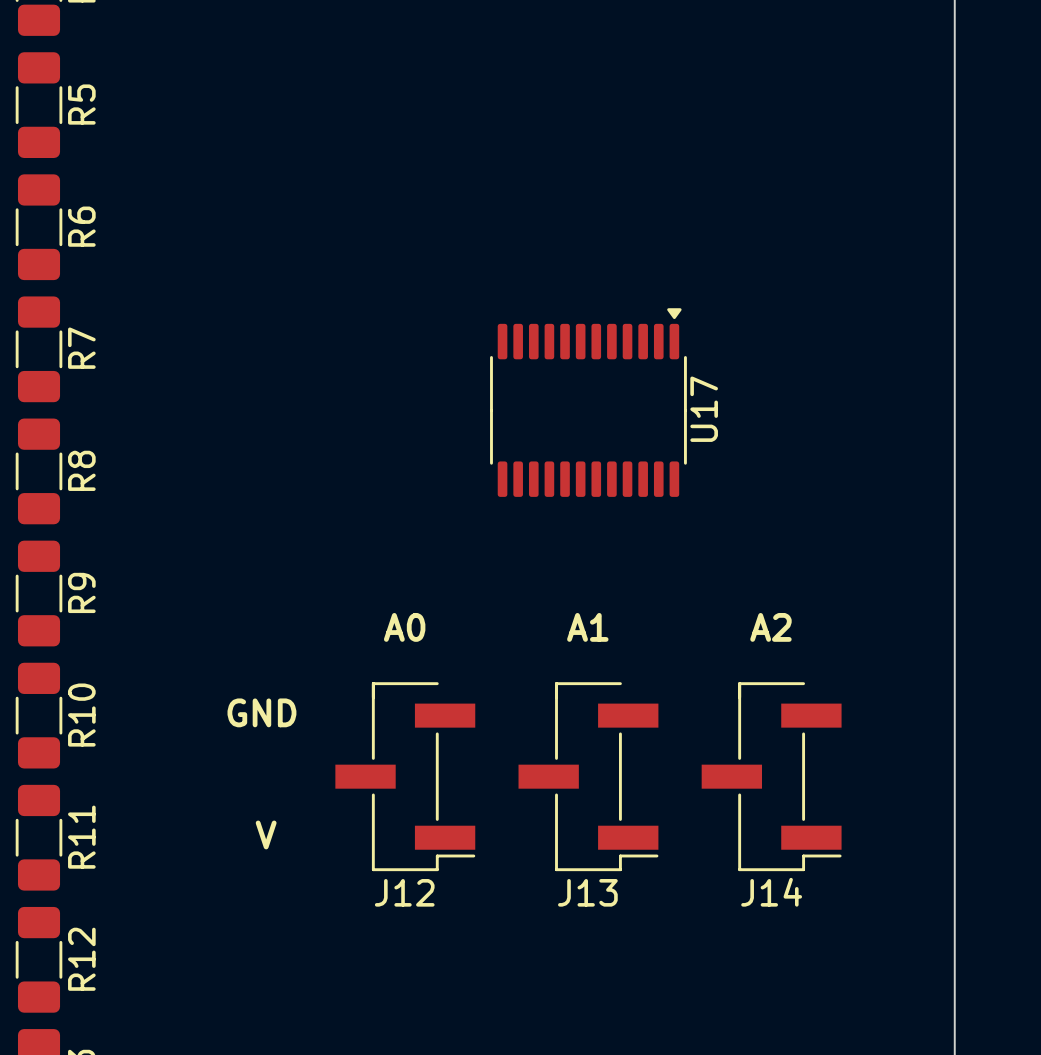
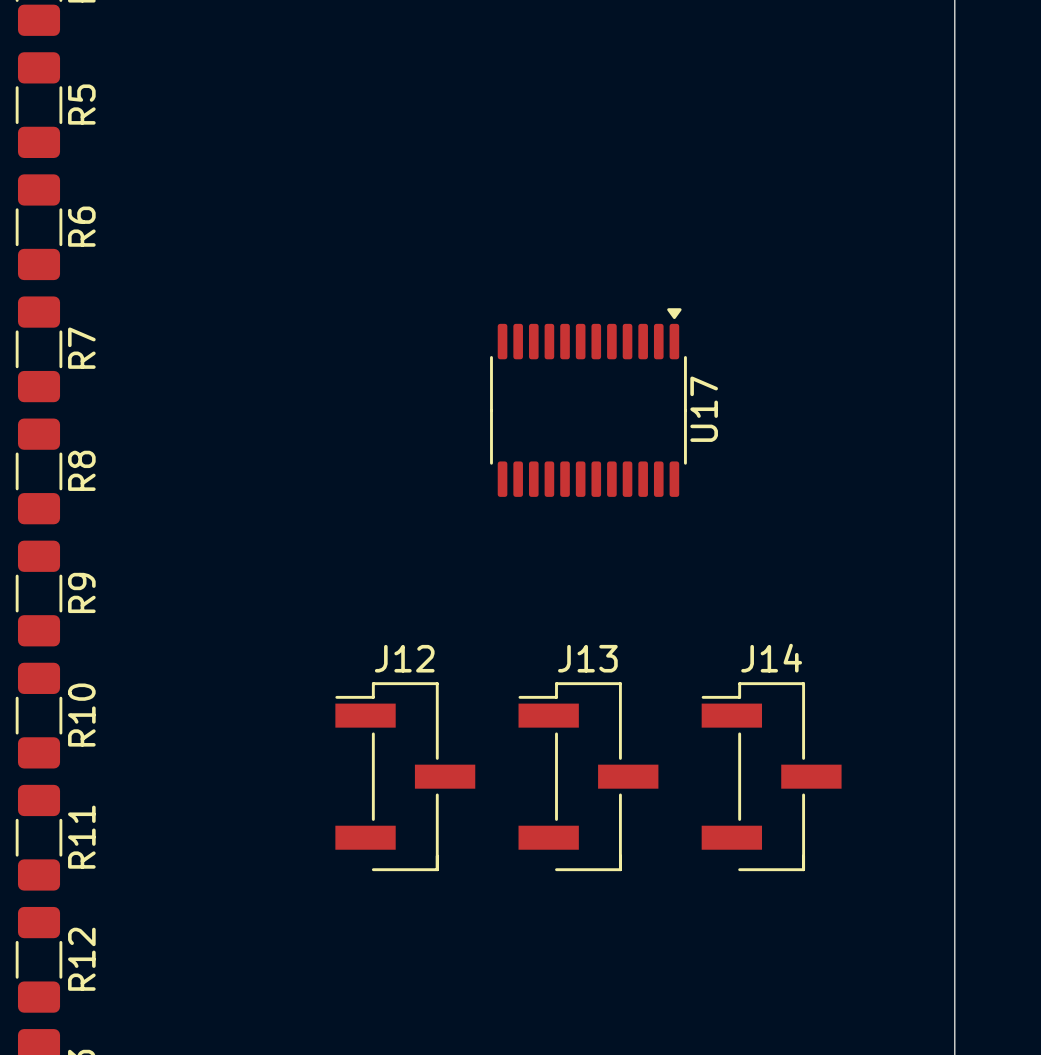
text: A0 (404, 627) -> none
text: A1 (587, 627) -> none
text: A2 (770, 627) -> none
text: GND (261, 712) -> none
J12 rotation: 0° (405, 776) -> 180° (405, 776)
J13 rotation: 0° (588, 776) -> 180° (588, 776)
J14 rotation: 0° (771, 776) -> 180° (771, 776)
text: V (266, 834) -> none

